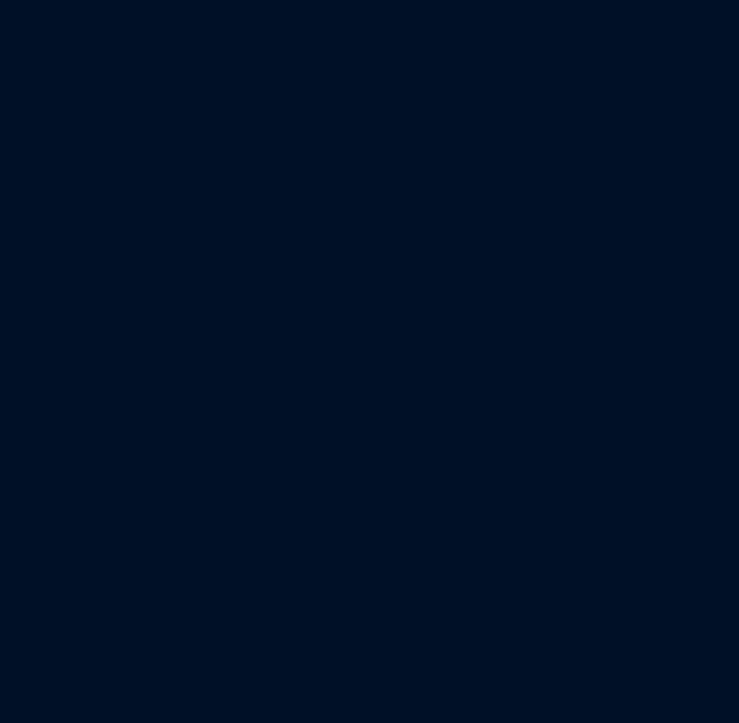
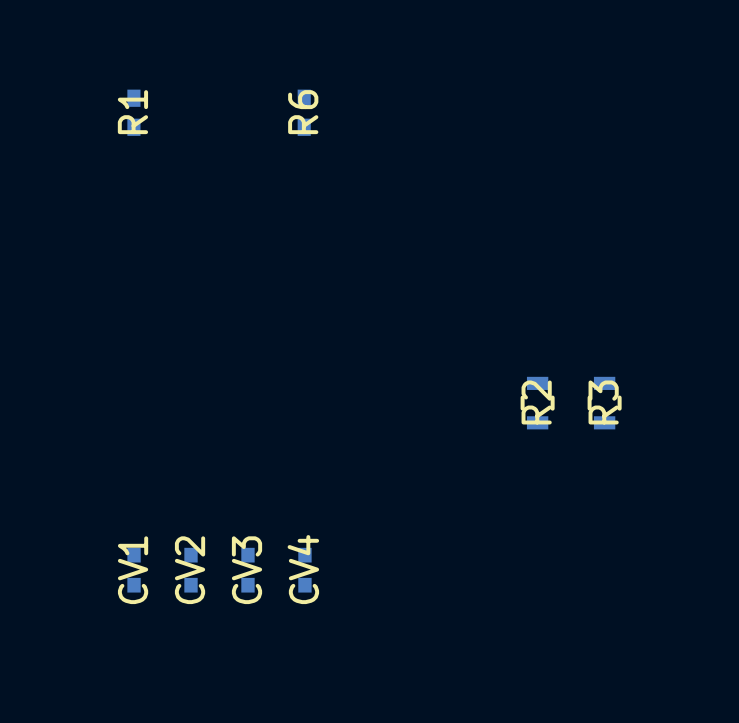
R1: none -> (133, 112)
R6: none -> (304, 112)
R2: none -> (537, 403)
R3: none -> (604, 403)
CV1: none -> (134, 570)
CV2: none -> (191, 570)
CV3: none -> (247, 570)
CV4: none -> (304, 570)

